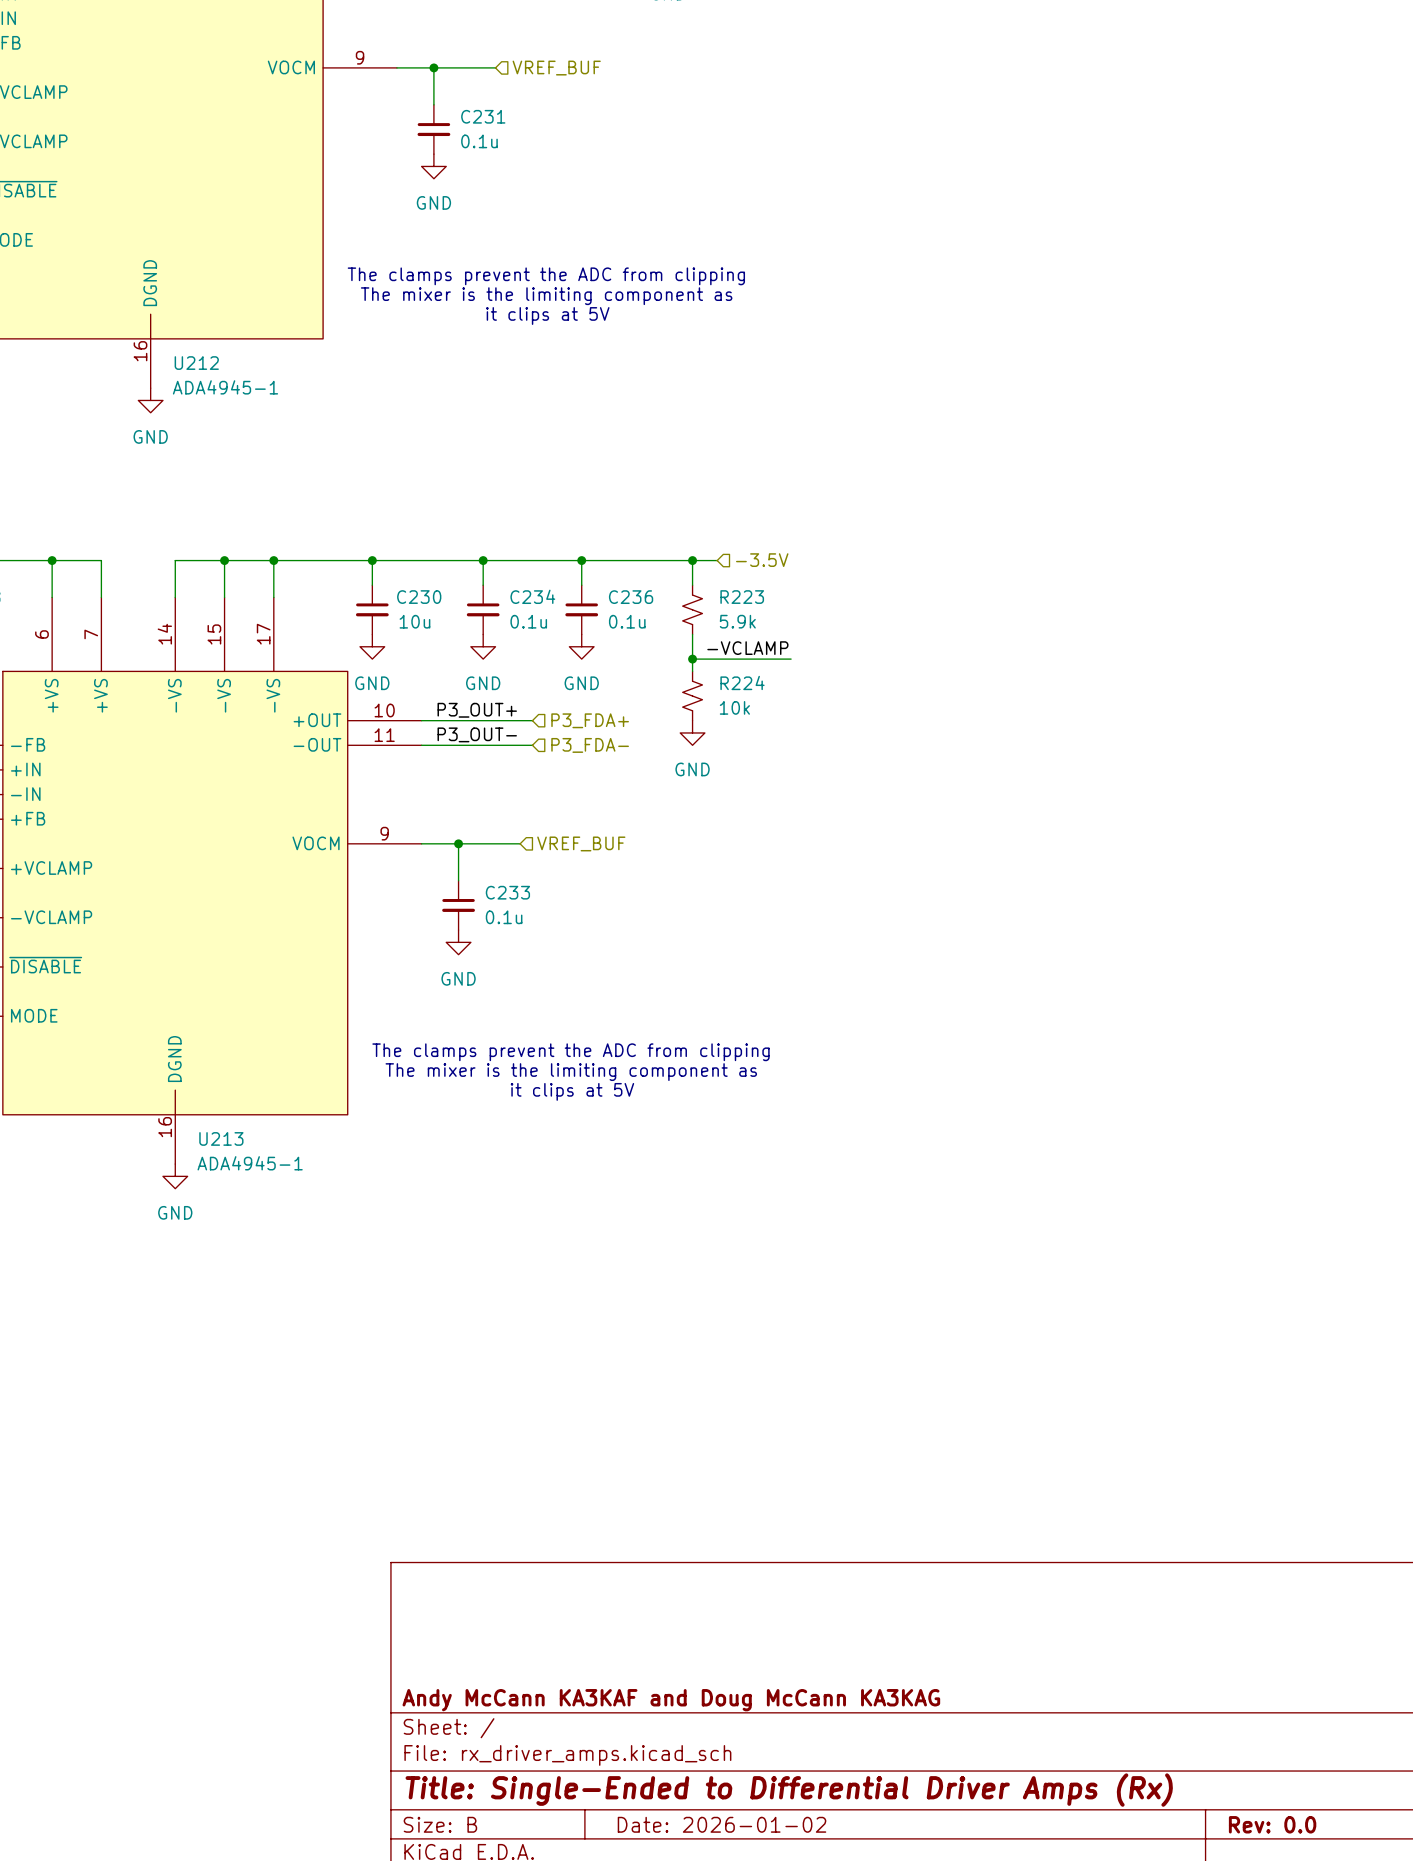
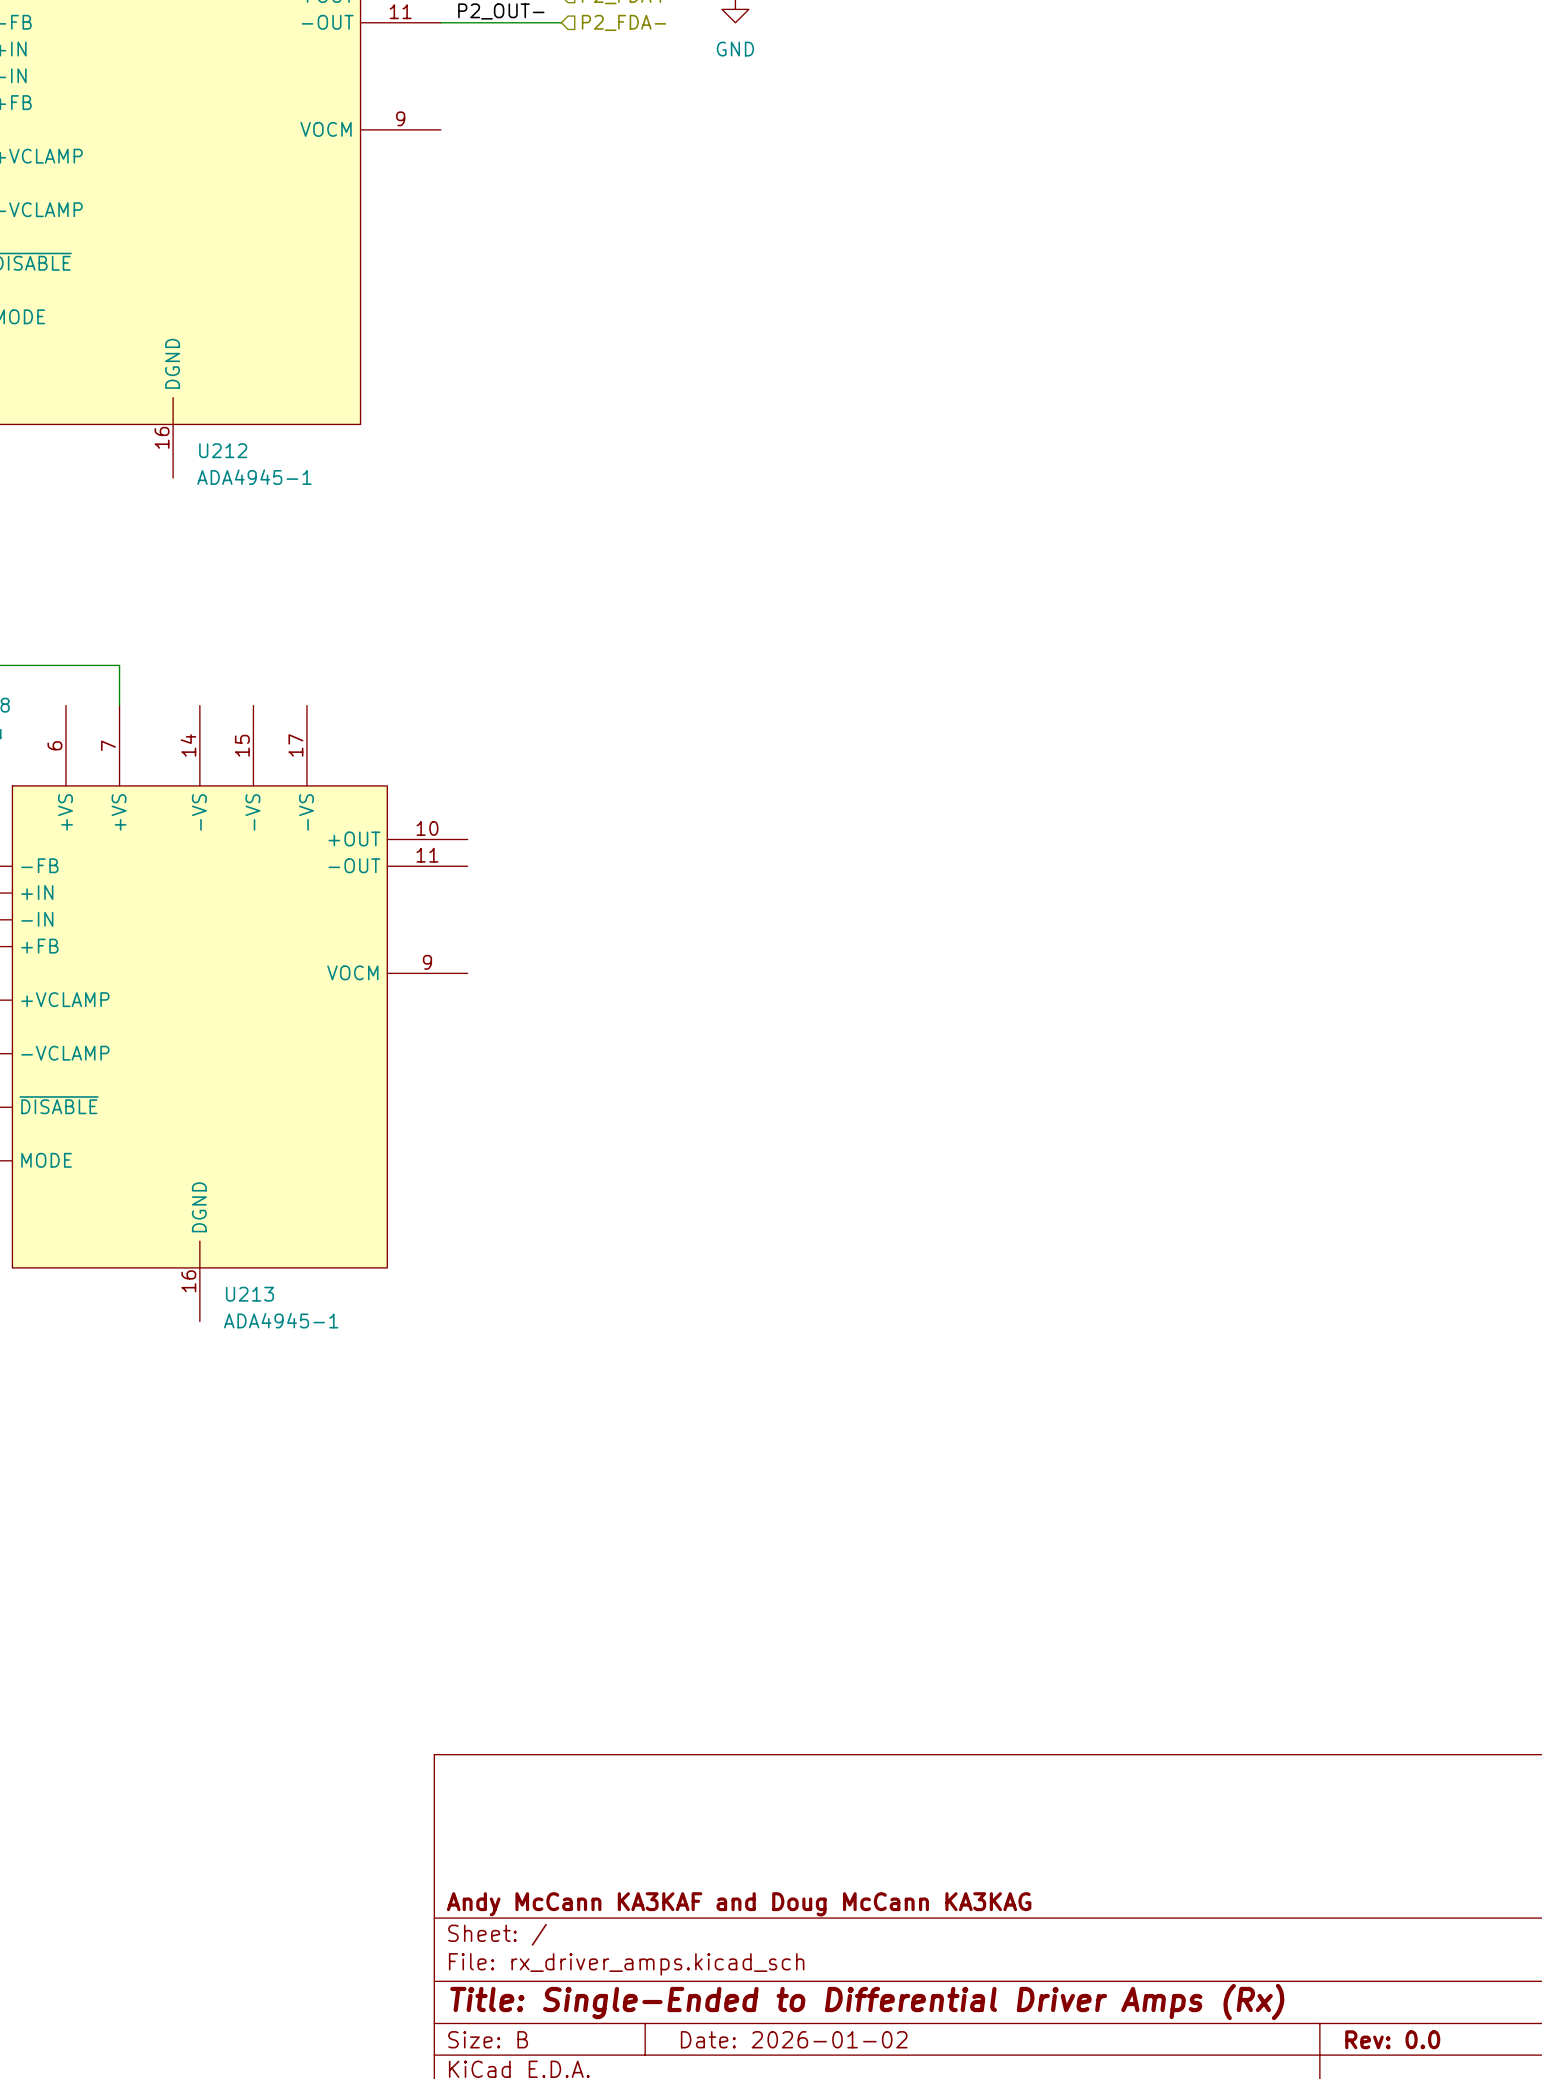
wire: (396, 67) (495, 67) -> none
wire: (433, 67) (433, 104) -> none
junction: (433, 67) -> none
hierarchical label: VREF_BUF (556, 68) -> none
C231: 0.1u (433, 129) -> none
power symbol: GND (433, 166) -> none
text: The clamps prevent the ADC from clipping (546, 276) -> none
text: The mixer is the limiting component as (546, 296) -> none
text: it clips at 5V (547, 316) -> none
power symbol: GND (150, 400) -> none
wire: (52, 560) (52, 597) -> none
junction: (52, 560) -> none
wire: (224, 560) (224, 597) -> none
junction: (224, 560) -> none
wire: (273, 560) (273, 597) -> none
junction: (273, 560) -> none
wire: (372, 560) (372, 585) -> none
junction: (372, 560) -> none
wire: (483, 560) (483, 585) -> none
junction: (483, 560) -> none
wire: (581, 560) (581, 585) -> none
junction: (581, 560) -> none
wire: (692, 560) (692, 585) -> none
junction: (692, 560) -> none
wire: (717, 560) (175, 560) (175, 597) -> none
hierarchical label: -3.5V (762, 560) -> none
C230: 10u (372, 609) -> none
C234: 0.1u (483, 609) -> none
C236: 0.1u (581, 609) -> none
R223: 5.9k (692, 609) -> none
wire: (692, 634) (692, 671) -> none
power symbol: GND (372, 646) -> none
power symbol: GND (483, 646) -> none
power symbol: GND (581, 646) -> none
label: -VCLAMP (747, 648) -> none
wire: (692, 659) (791, 659) -> none
junction: (692, 659) -> none
R224: 10k (692, 696) -> none
label: P3_OUT+ (477, 710) -> none
wire: (421, 720) (532, 720) -> none
hierarchical label: P3_FDA+ (590, 720) -> none
power symbol: GND (692, 732) -> none
label: P3_OUT- (477, 734) -> none
wire: (421, 745) (532, 745) -> none
hierarchical label: P3_FDA- (590, 745) -> none
wire: (421, 843) (520, 843) -> none
wire: (458, 843) (458, 880) -> none
junction: (458, 843) -> none
hierarchical label: VREF_BUF (581, 843) -> none
C233: 0.1u (458, 905) -> none
power symbol: GND (458, 942) -> none
text: The clamps prevent the ADC from clipping (570, 1052) -> none
text: The mixer is the limiting component as (571, 1072) -> none
text: it clips at 5V (572, 1091) -> none
power symbol: GND (175, 1176) -> none

